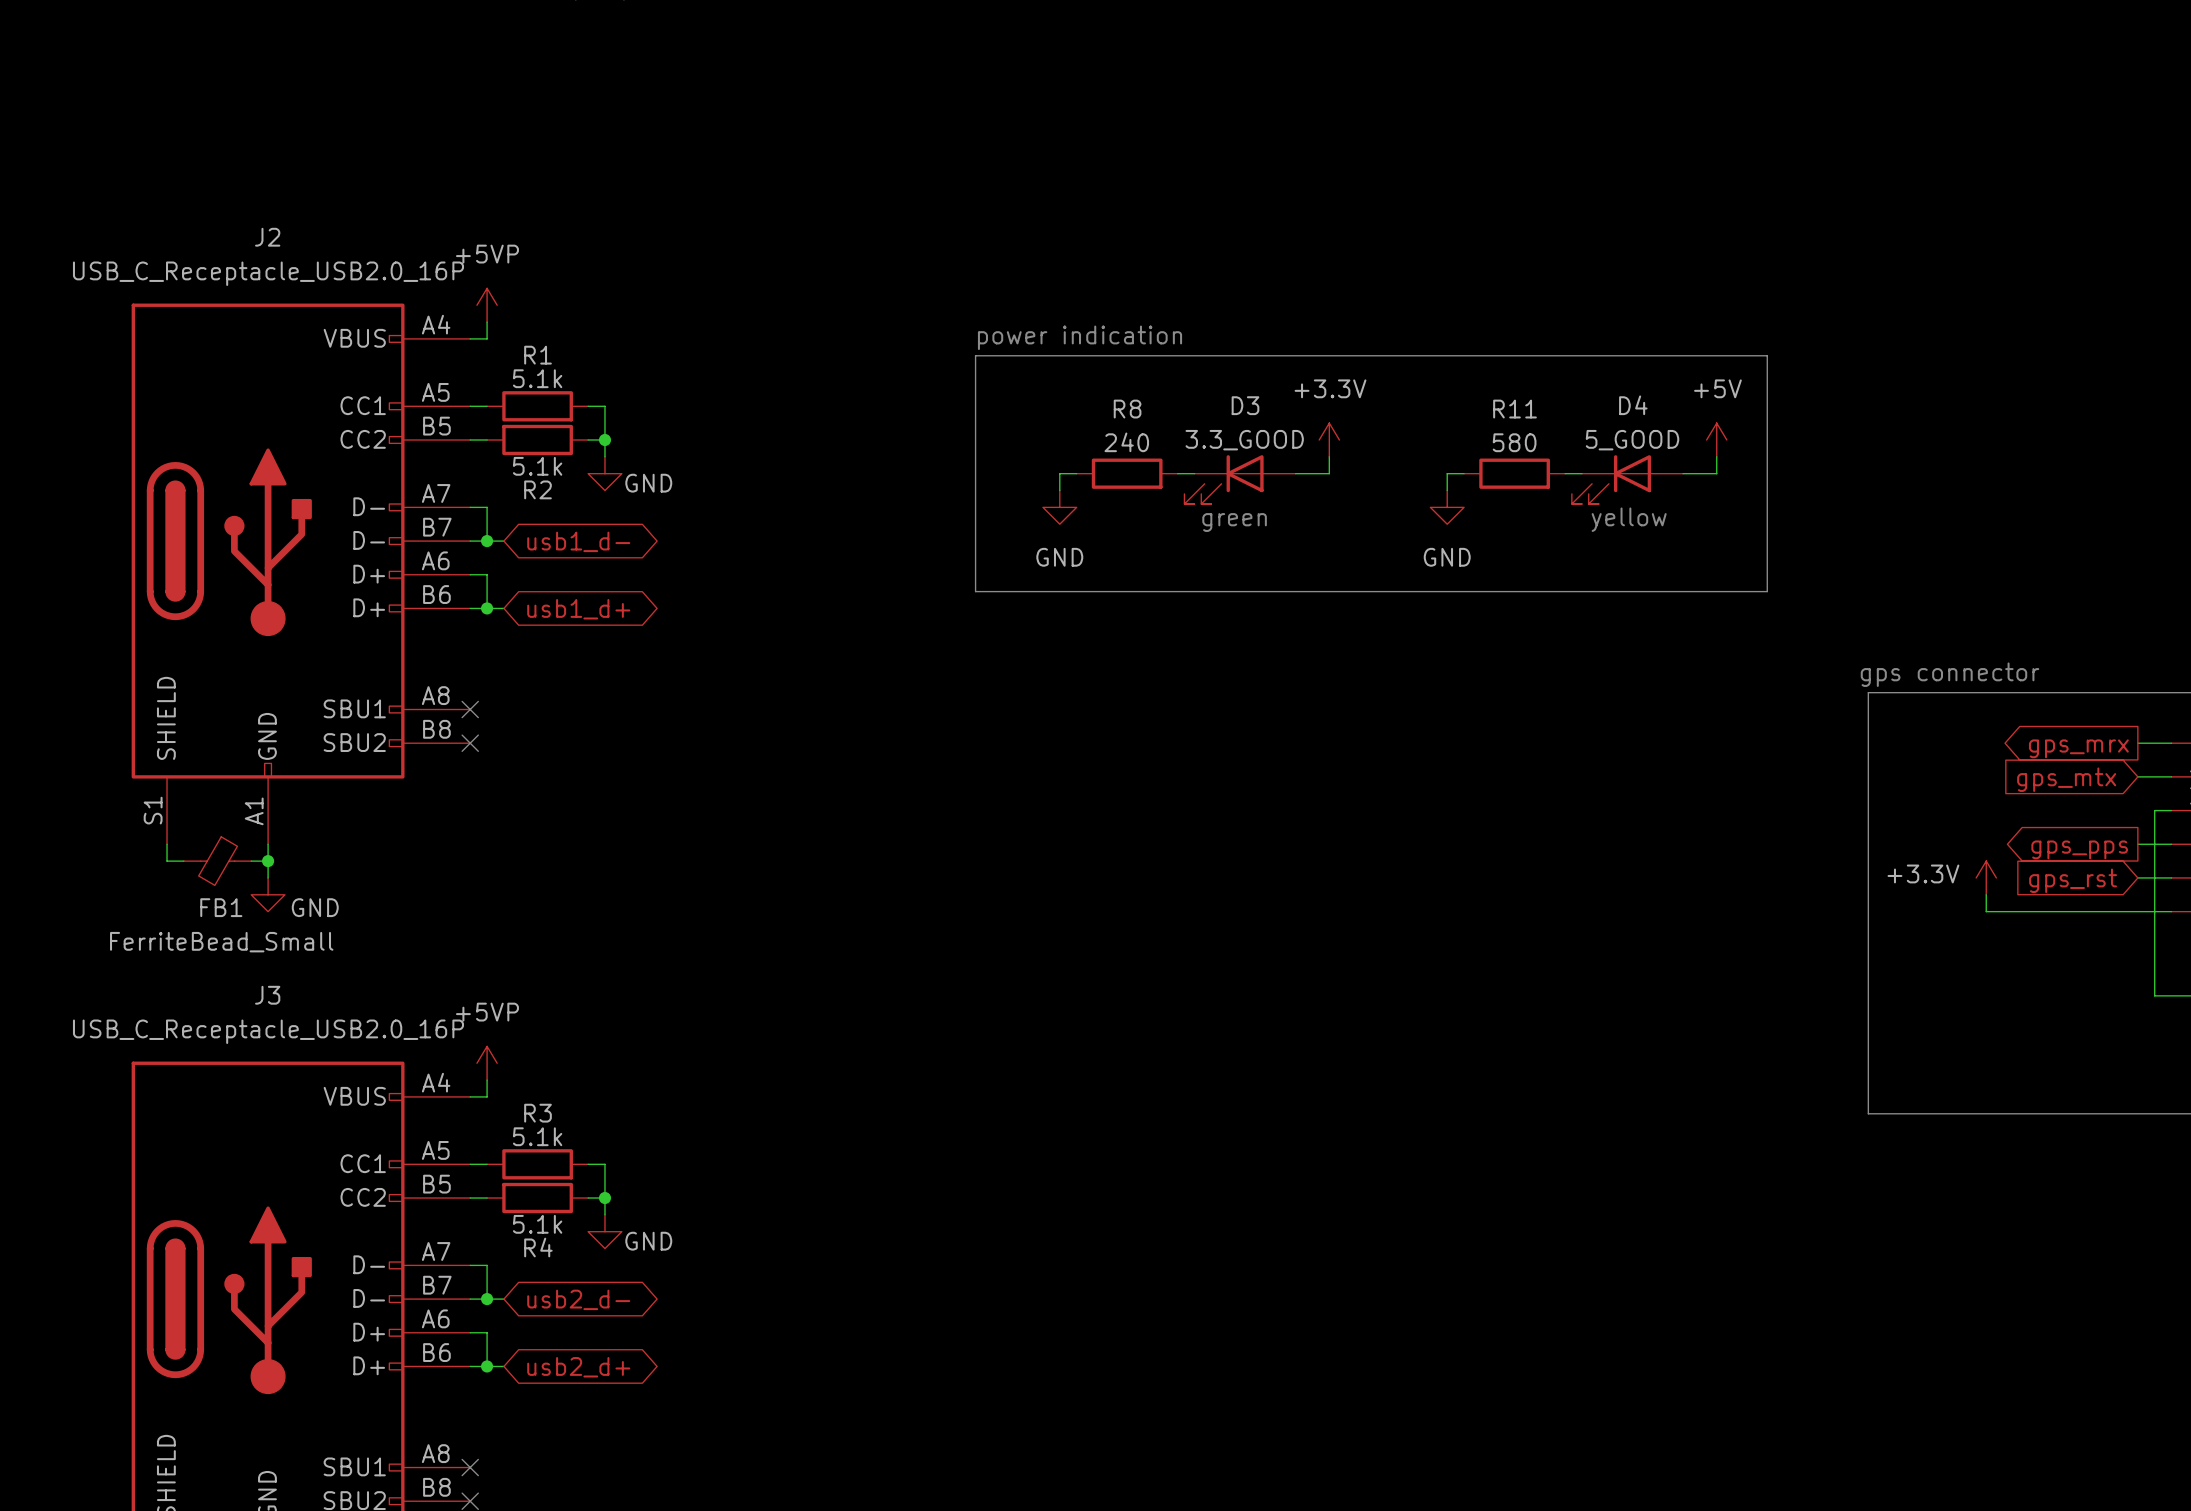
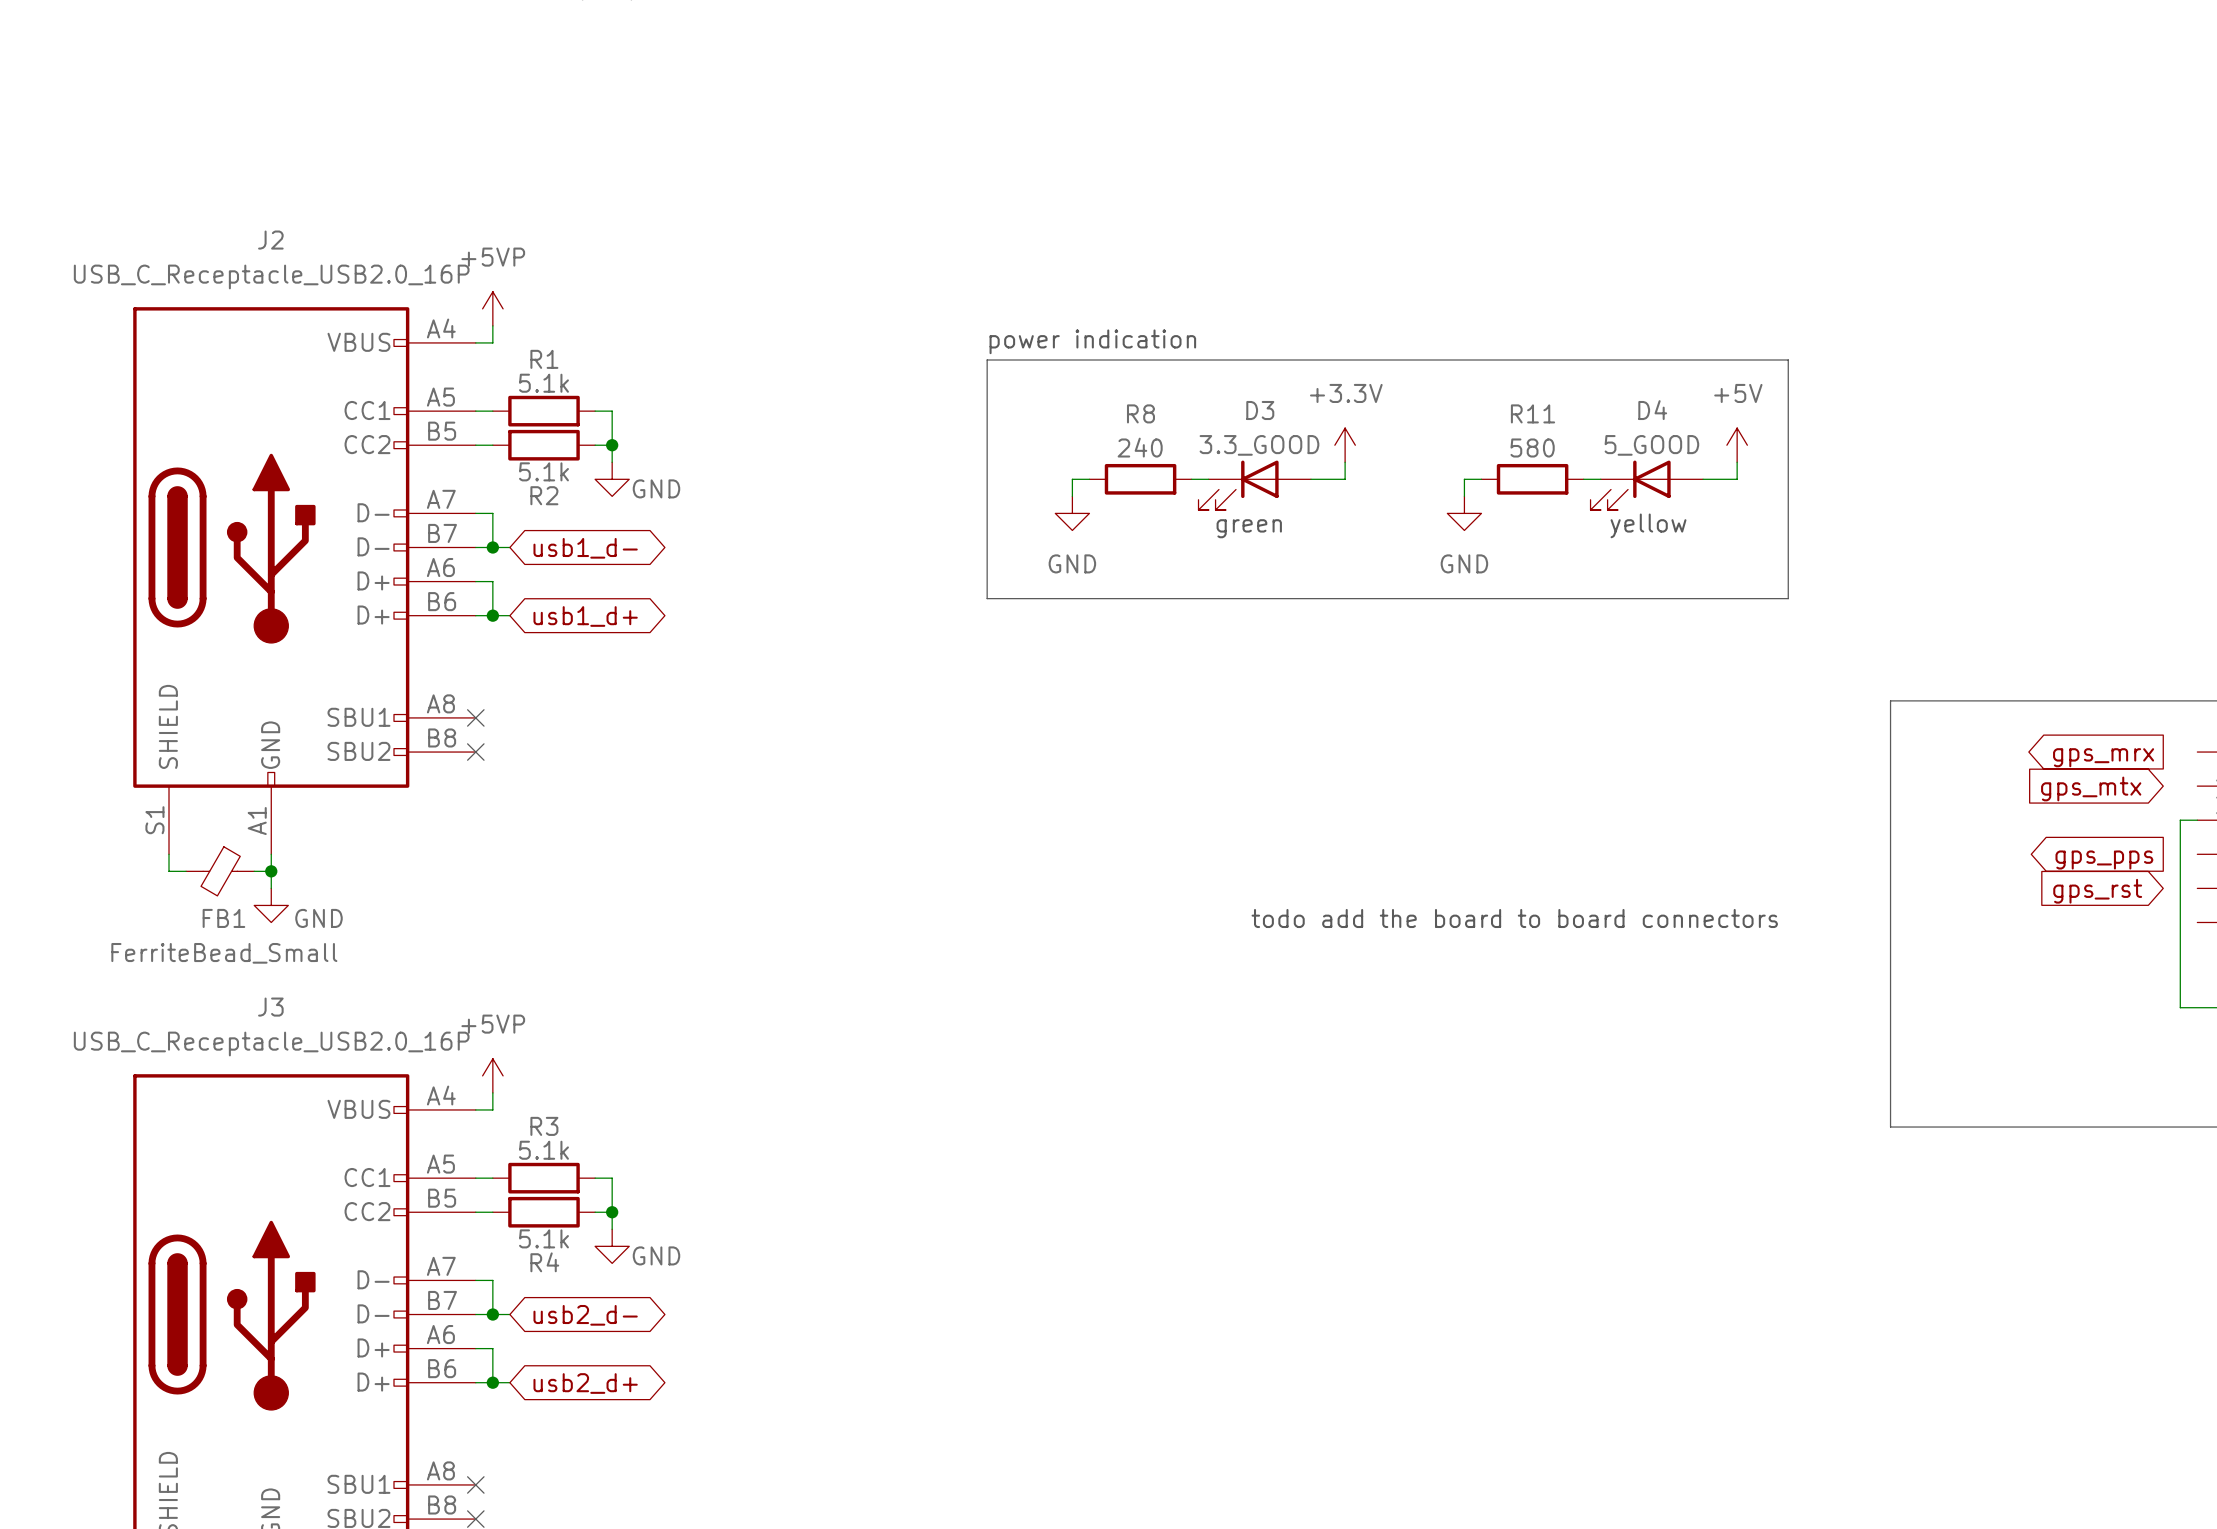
text: gps connector (1950, 674) -> none
wire: (2137, 743) (2171, 743) -> none
wire: (2137, 776) (2171, 776) -> none
wire: (2137, 844) (2171, 844) -> none
power symbol: +3.3V (1986, 877) -> none
wire: (2137, 877) (2171, 877) -> none
wire: (1986, 894) (1986, 911) (2171, 911) -> none
text: none -> todo add the board to board connectors (1514, 918)

